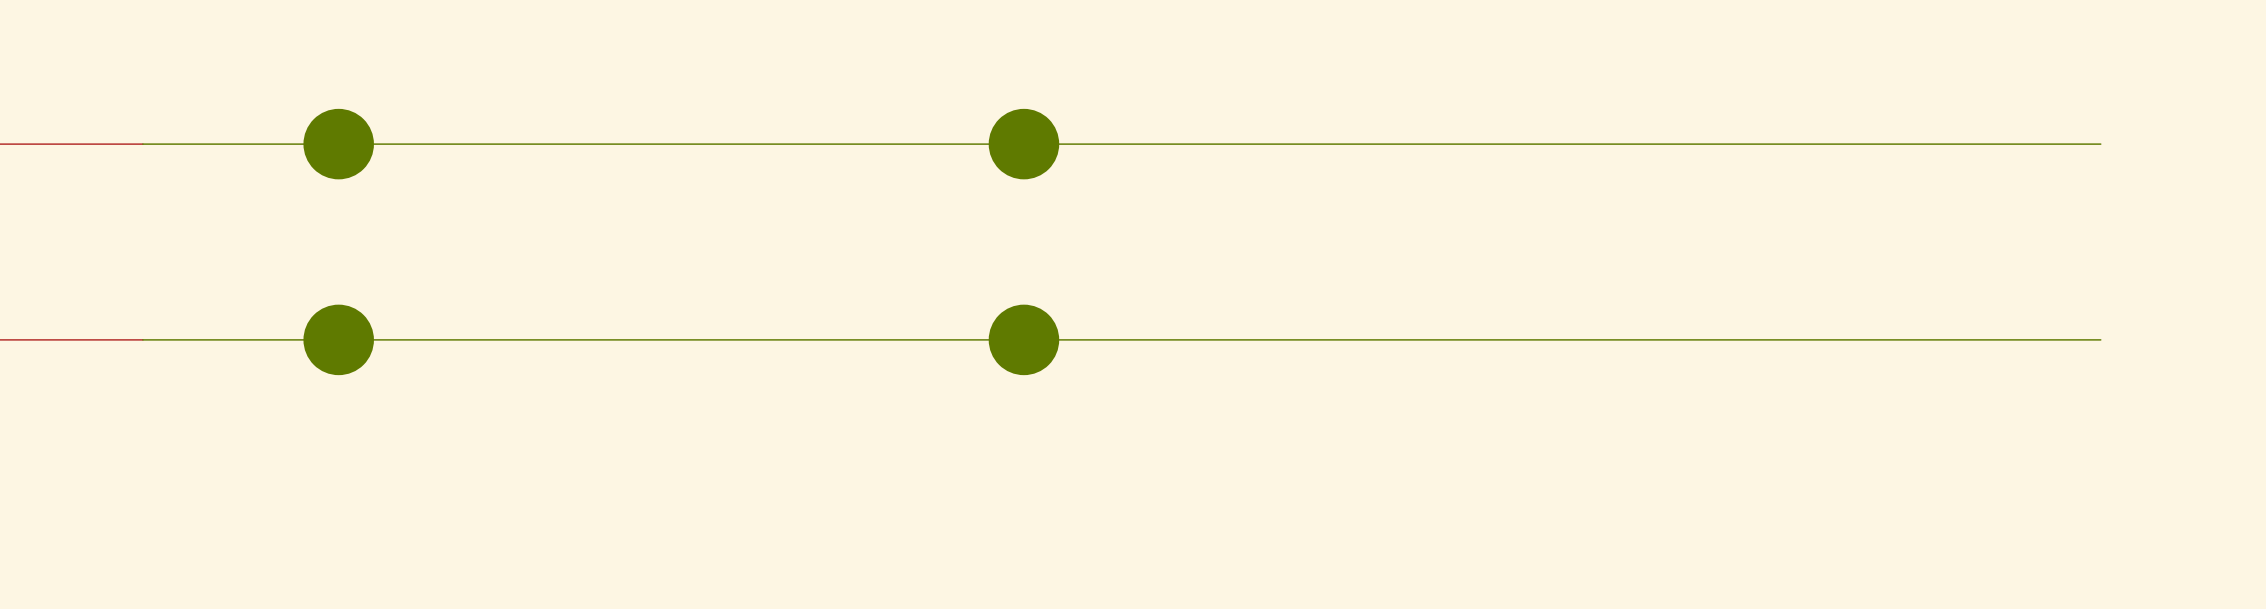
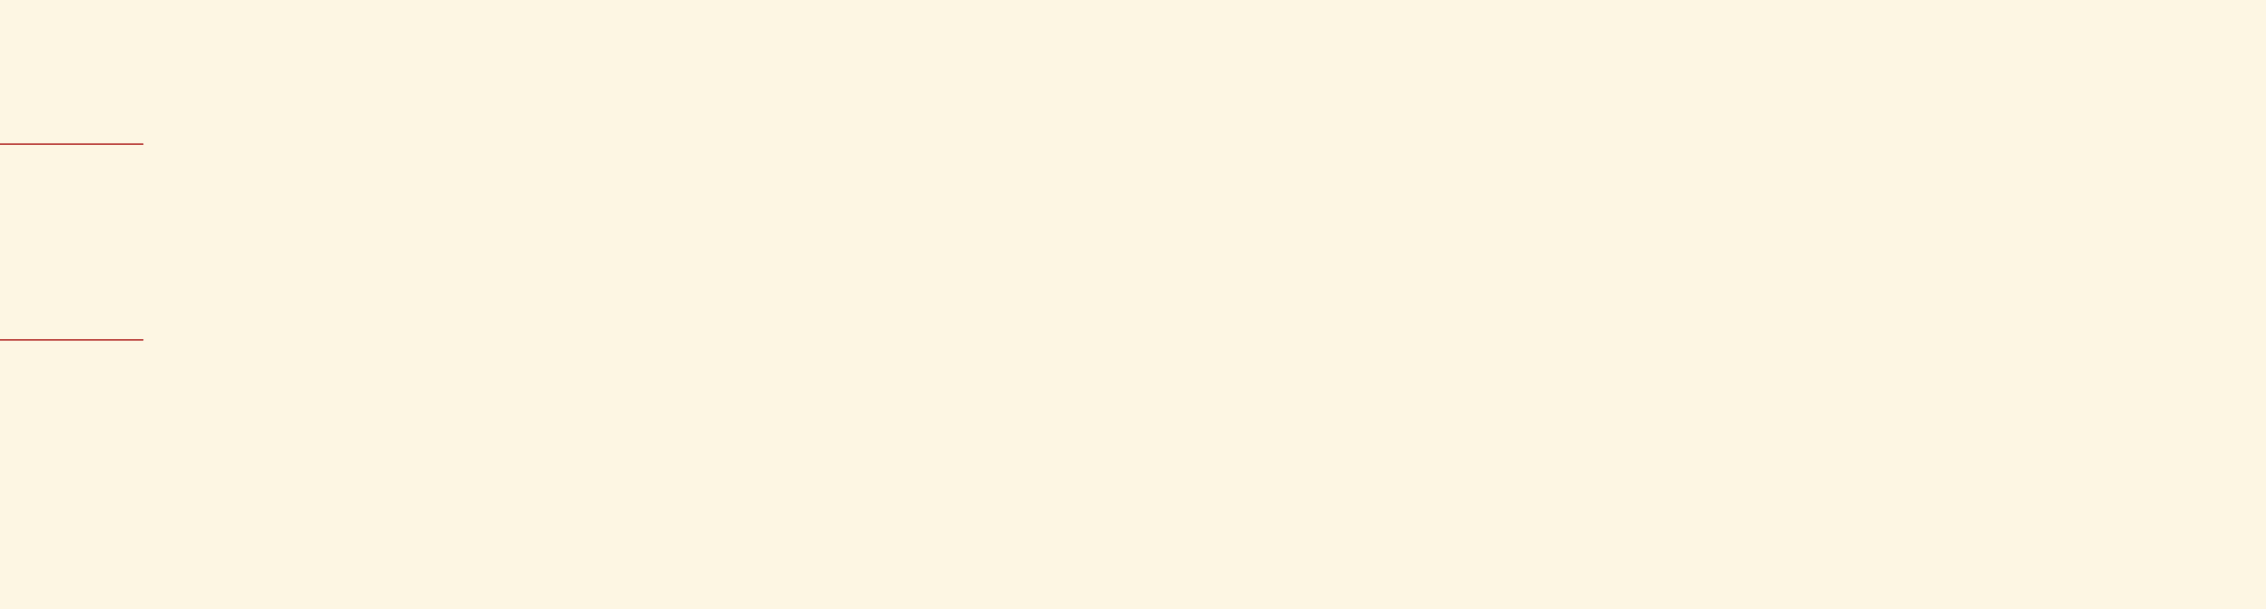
wire: (142, 144) (2100, 144) -> none
junction: (338, 144) -> none
junction: (1023, 144) -> none
wire: (142, 339) (2100, 339) -> none
junction: (338, 339) -> none
junction: (1023, 339) -> none

